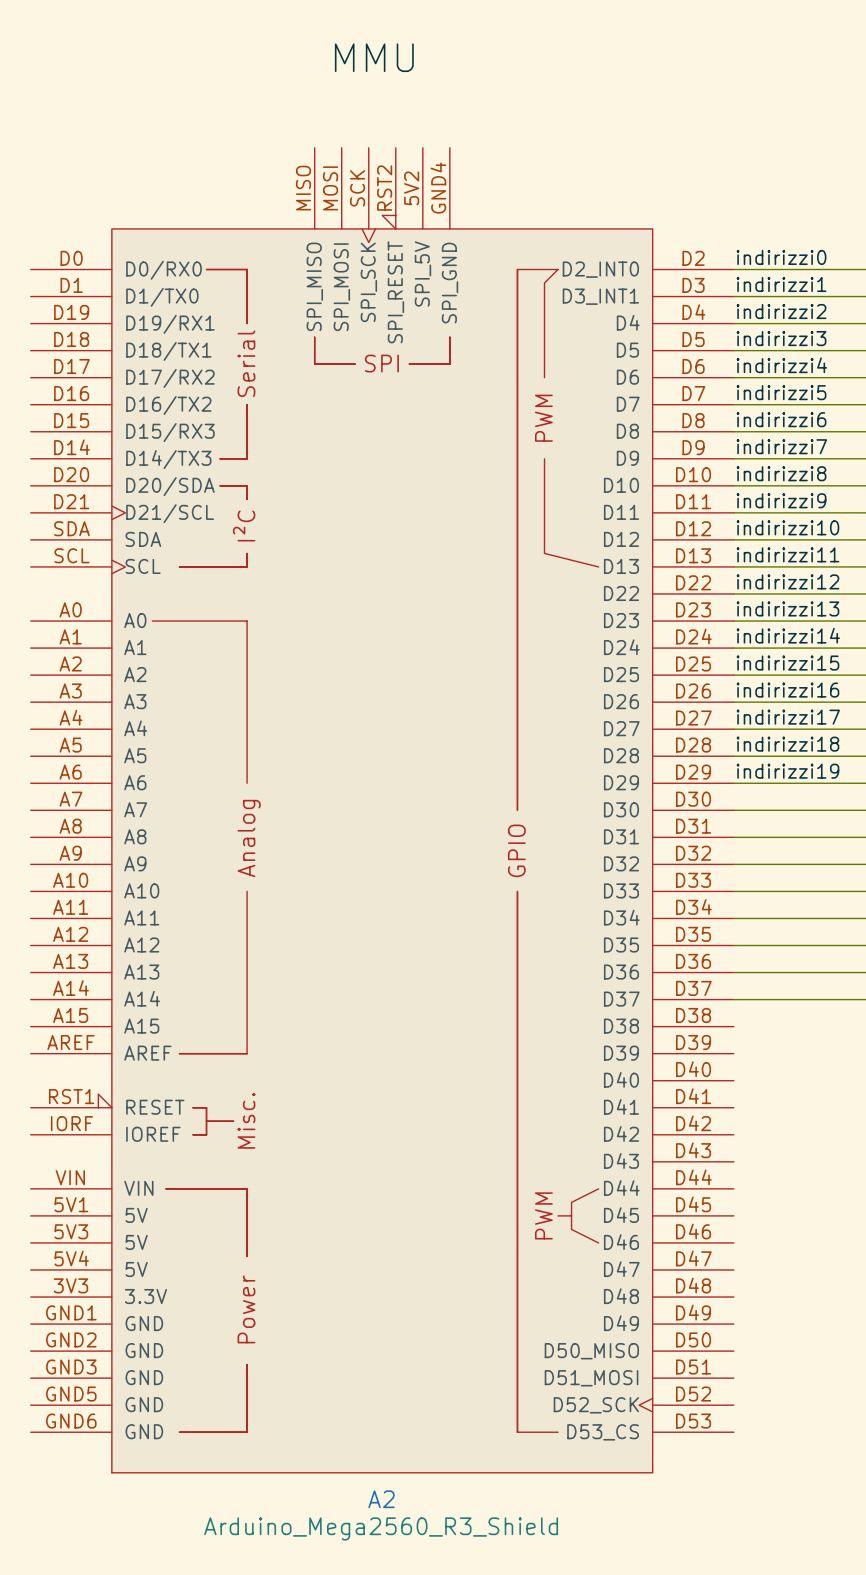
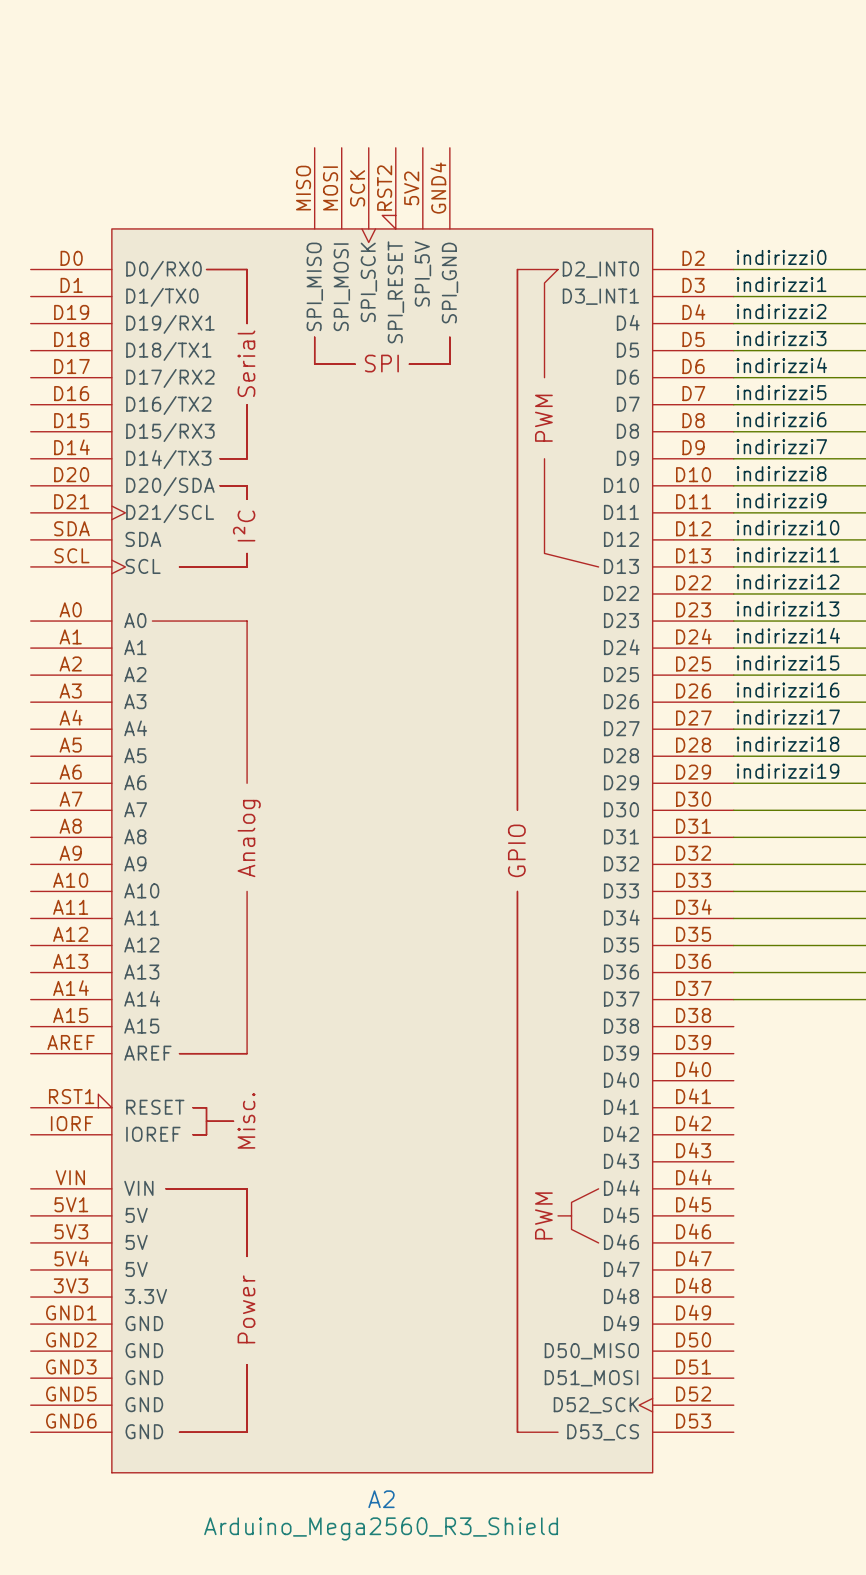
label: MMU (374, 57) -> none

